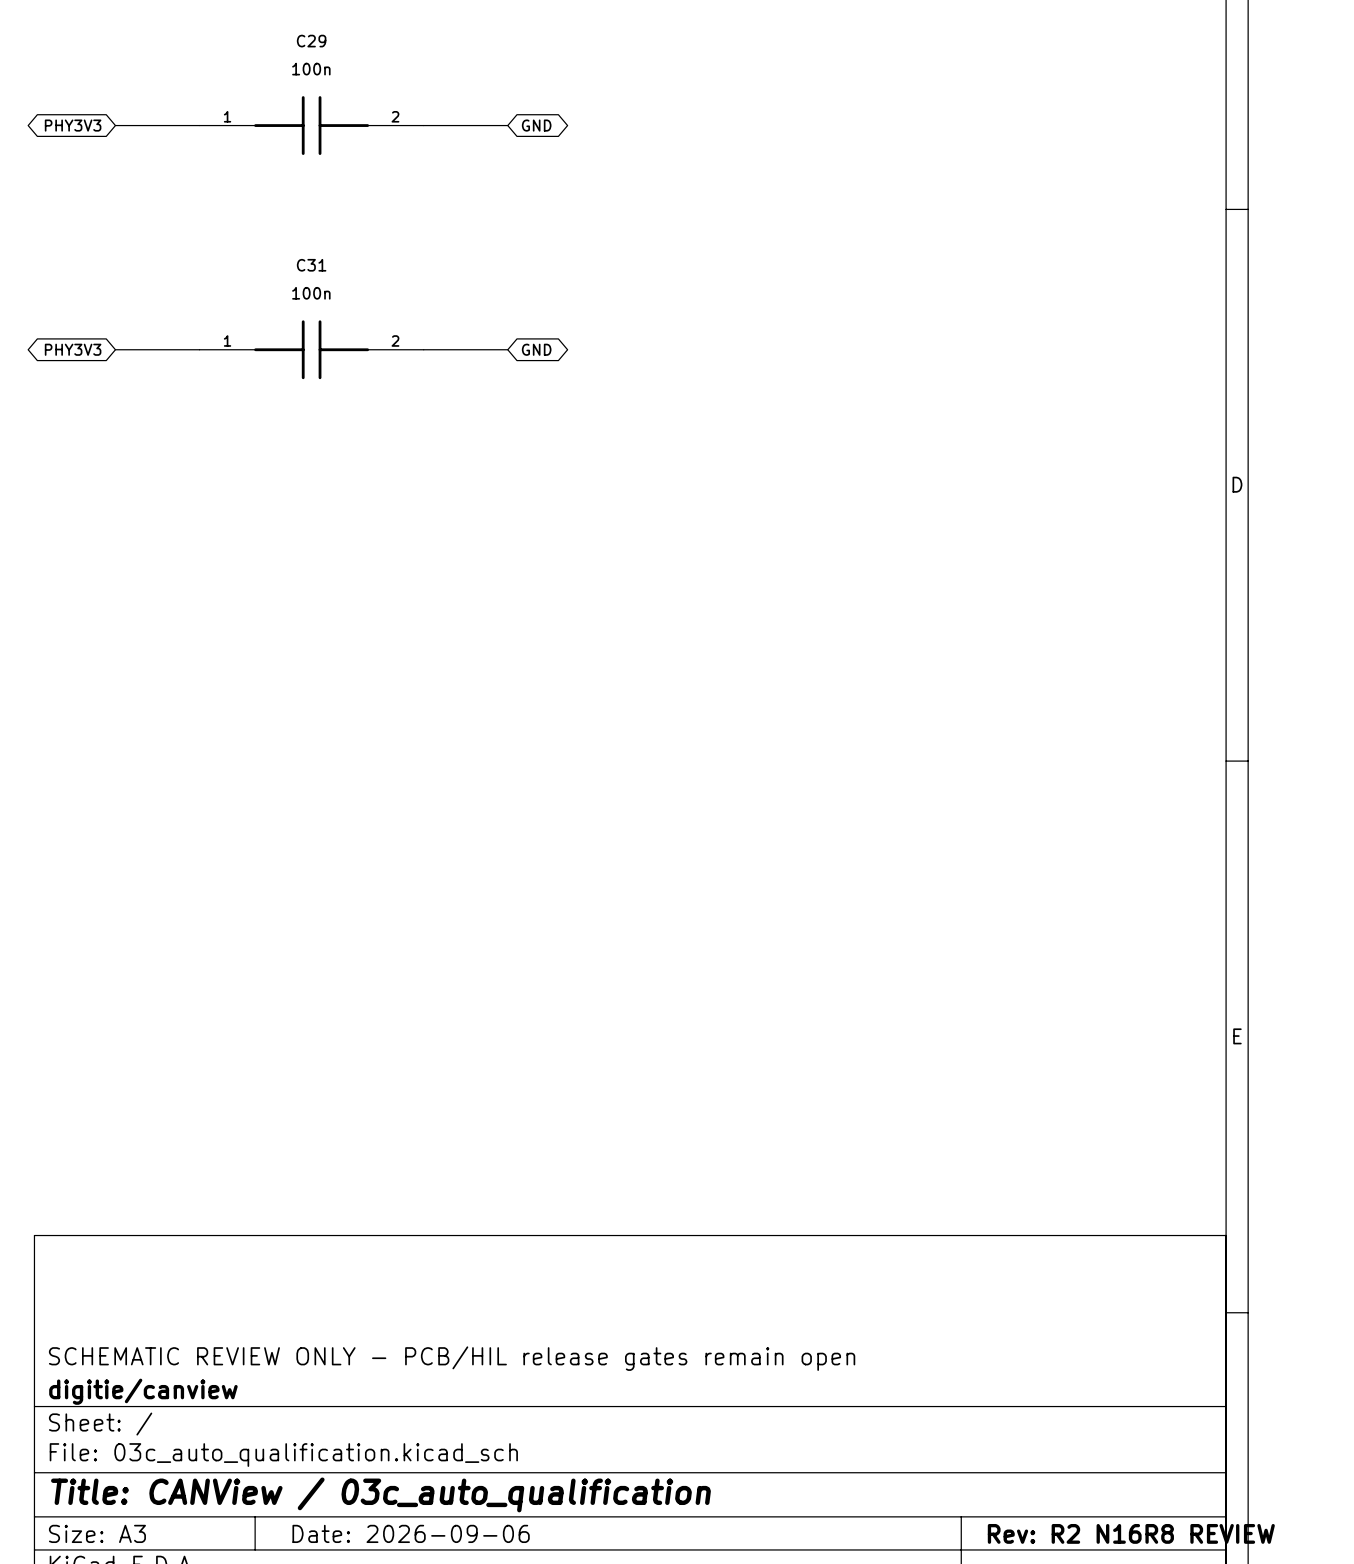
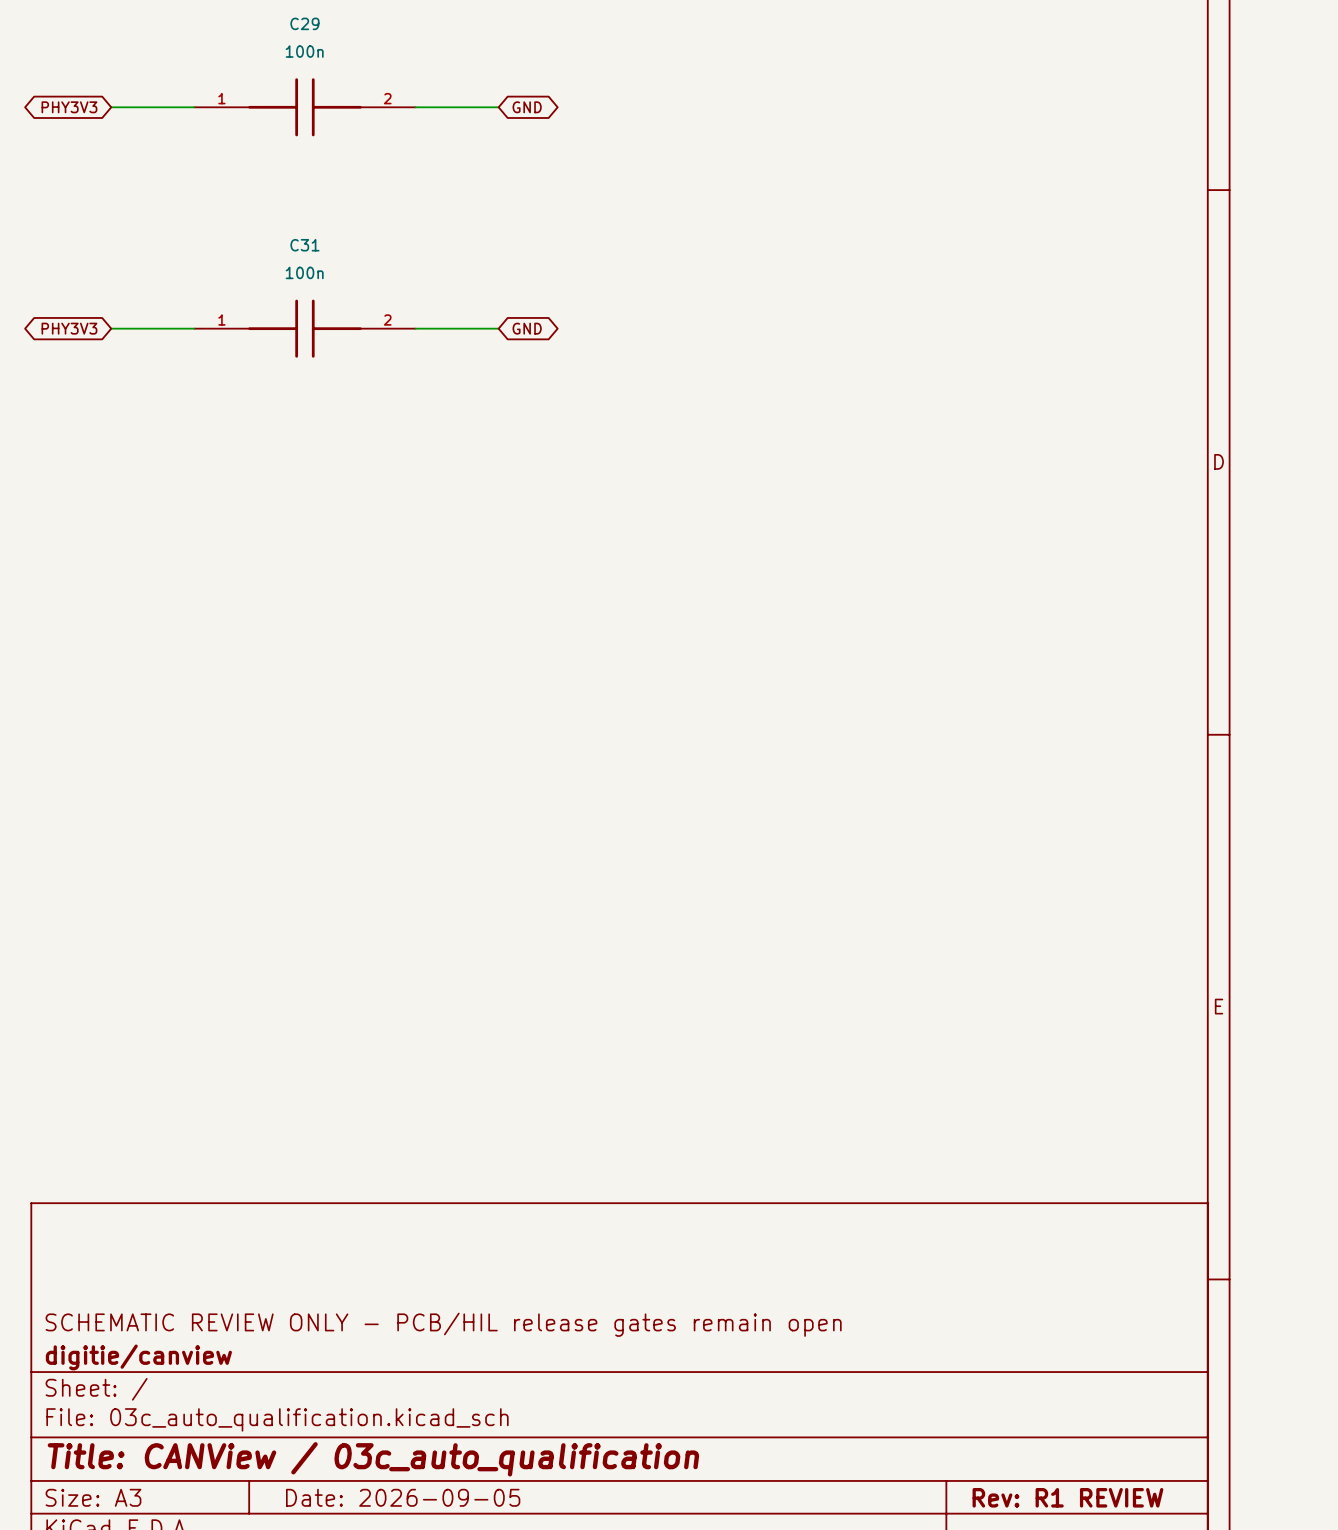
title block: Date: 2026-09-06 (411, 1533) -> Date: 2026-09-05 (403, 1497)
title block: Rev: R2 N16R8 REVIEW (1131, 1533) -> Rev: R1 REVIEW (1067, 1497)

